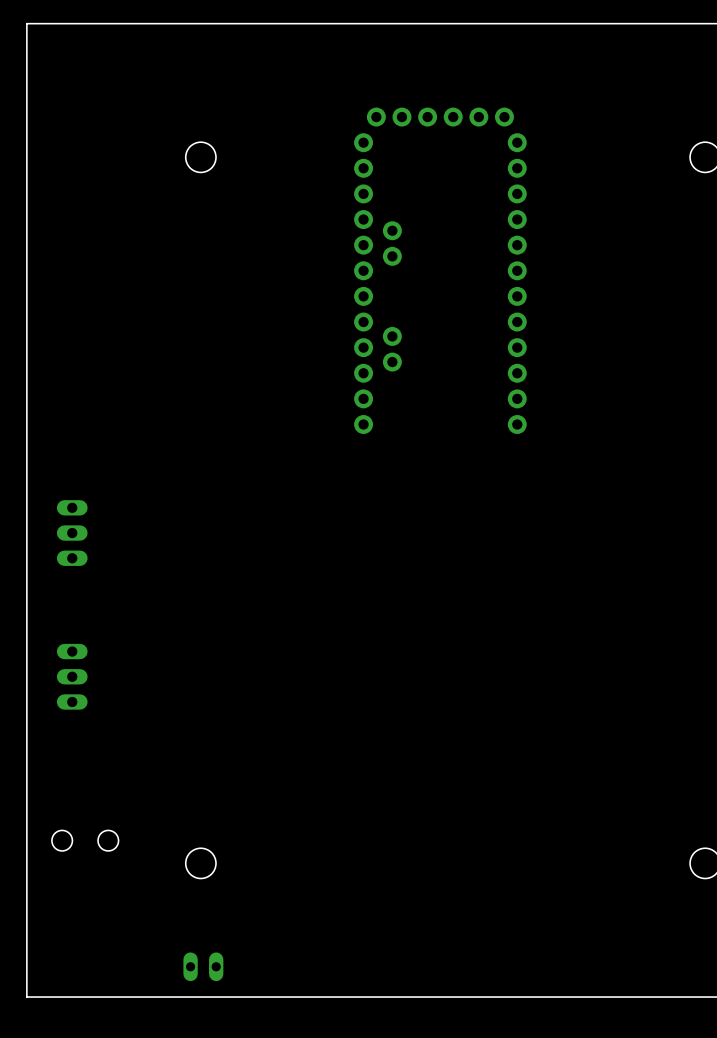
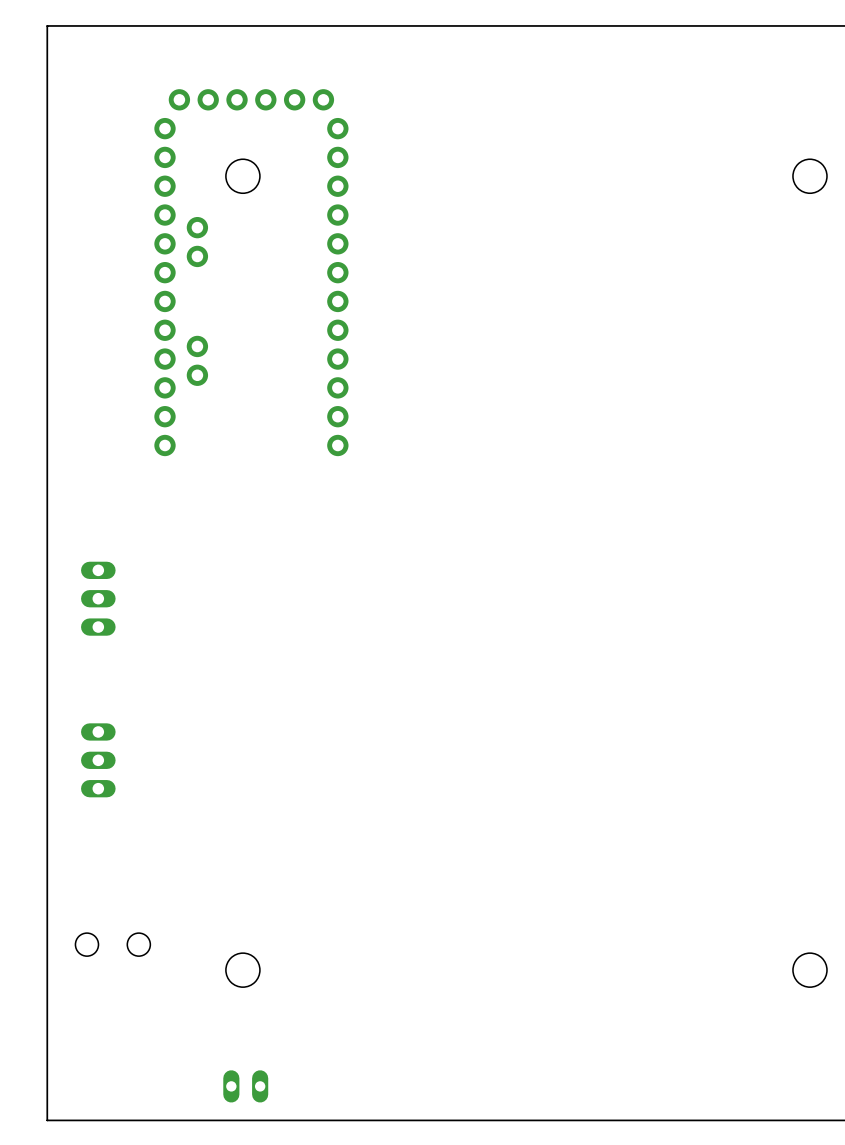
part position: (440, 270) -> (251, 272)

